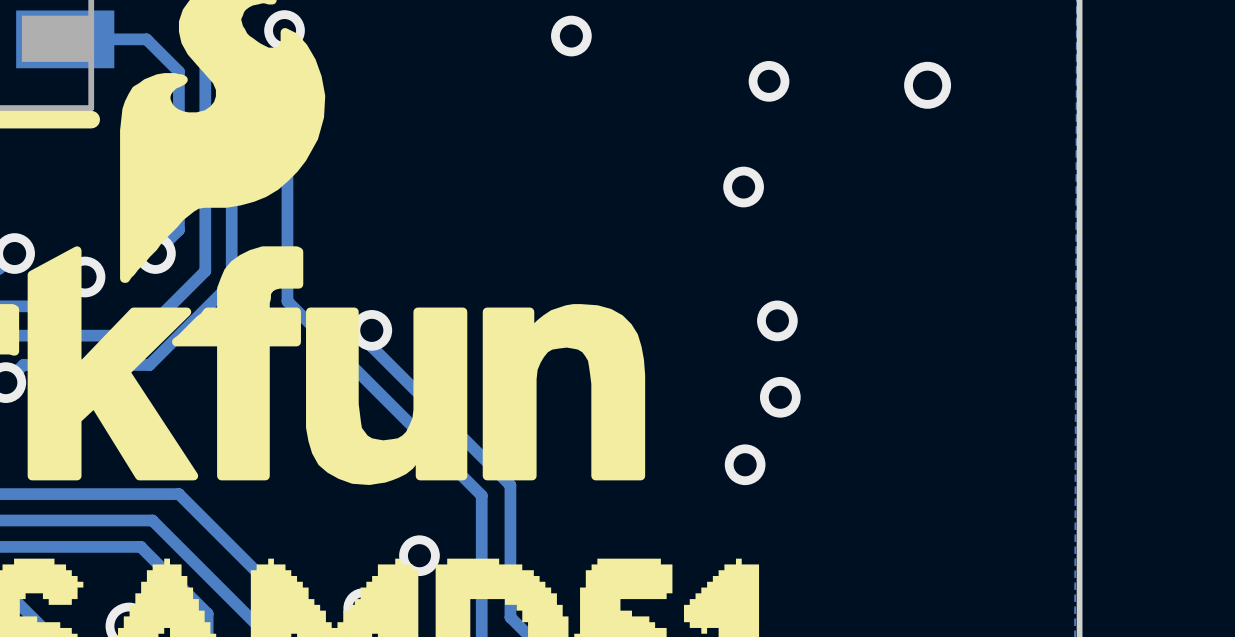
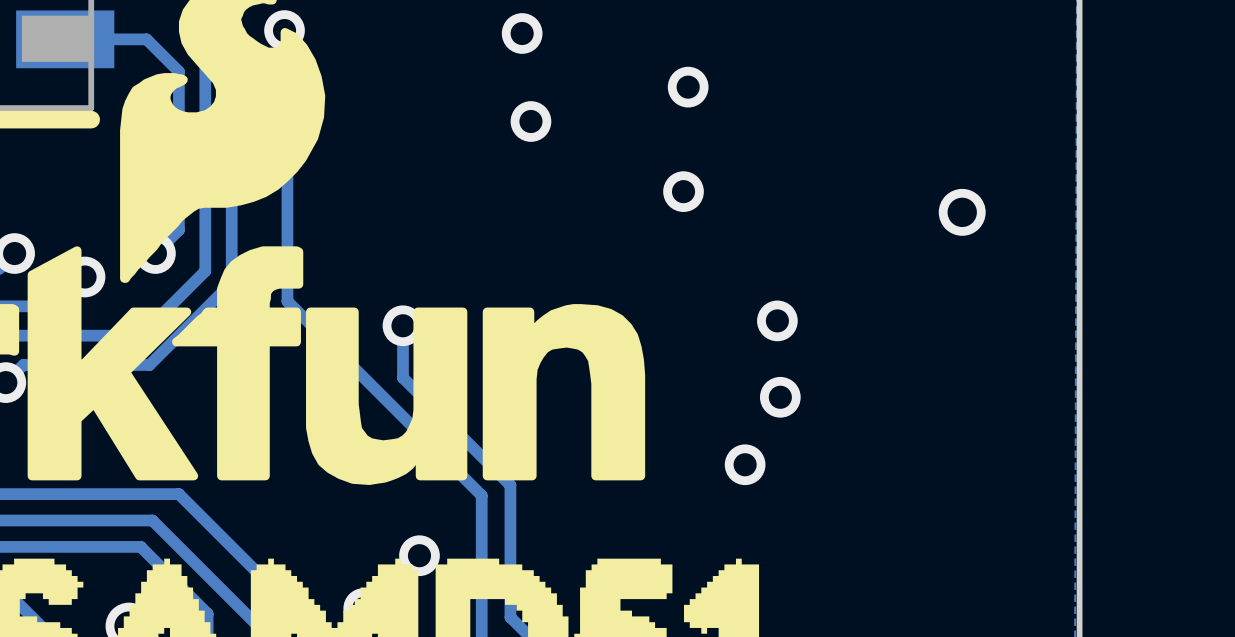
via: none -> (522, 33)
via: (571, 36) -> none
via: (769, 81) -> none
via position: (927, 85) -> (962, 212)
via: none -> (688, 87)
via: none -> (530, 121)
via: (743, 187) -> none
via: none -> (683, 191)
track: (371, 330) (371, 346) (402, 377) -> (402, 325) (402, 377)
via position: (371, 330) -> (402, 325)

